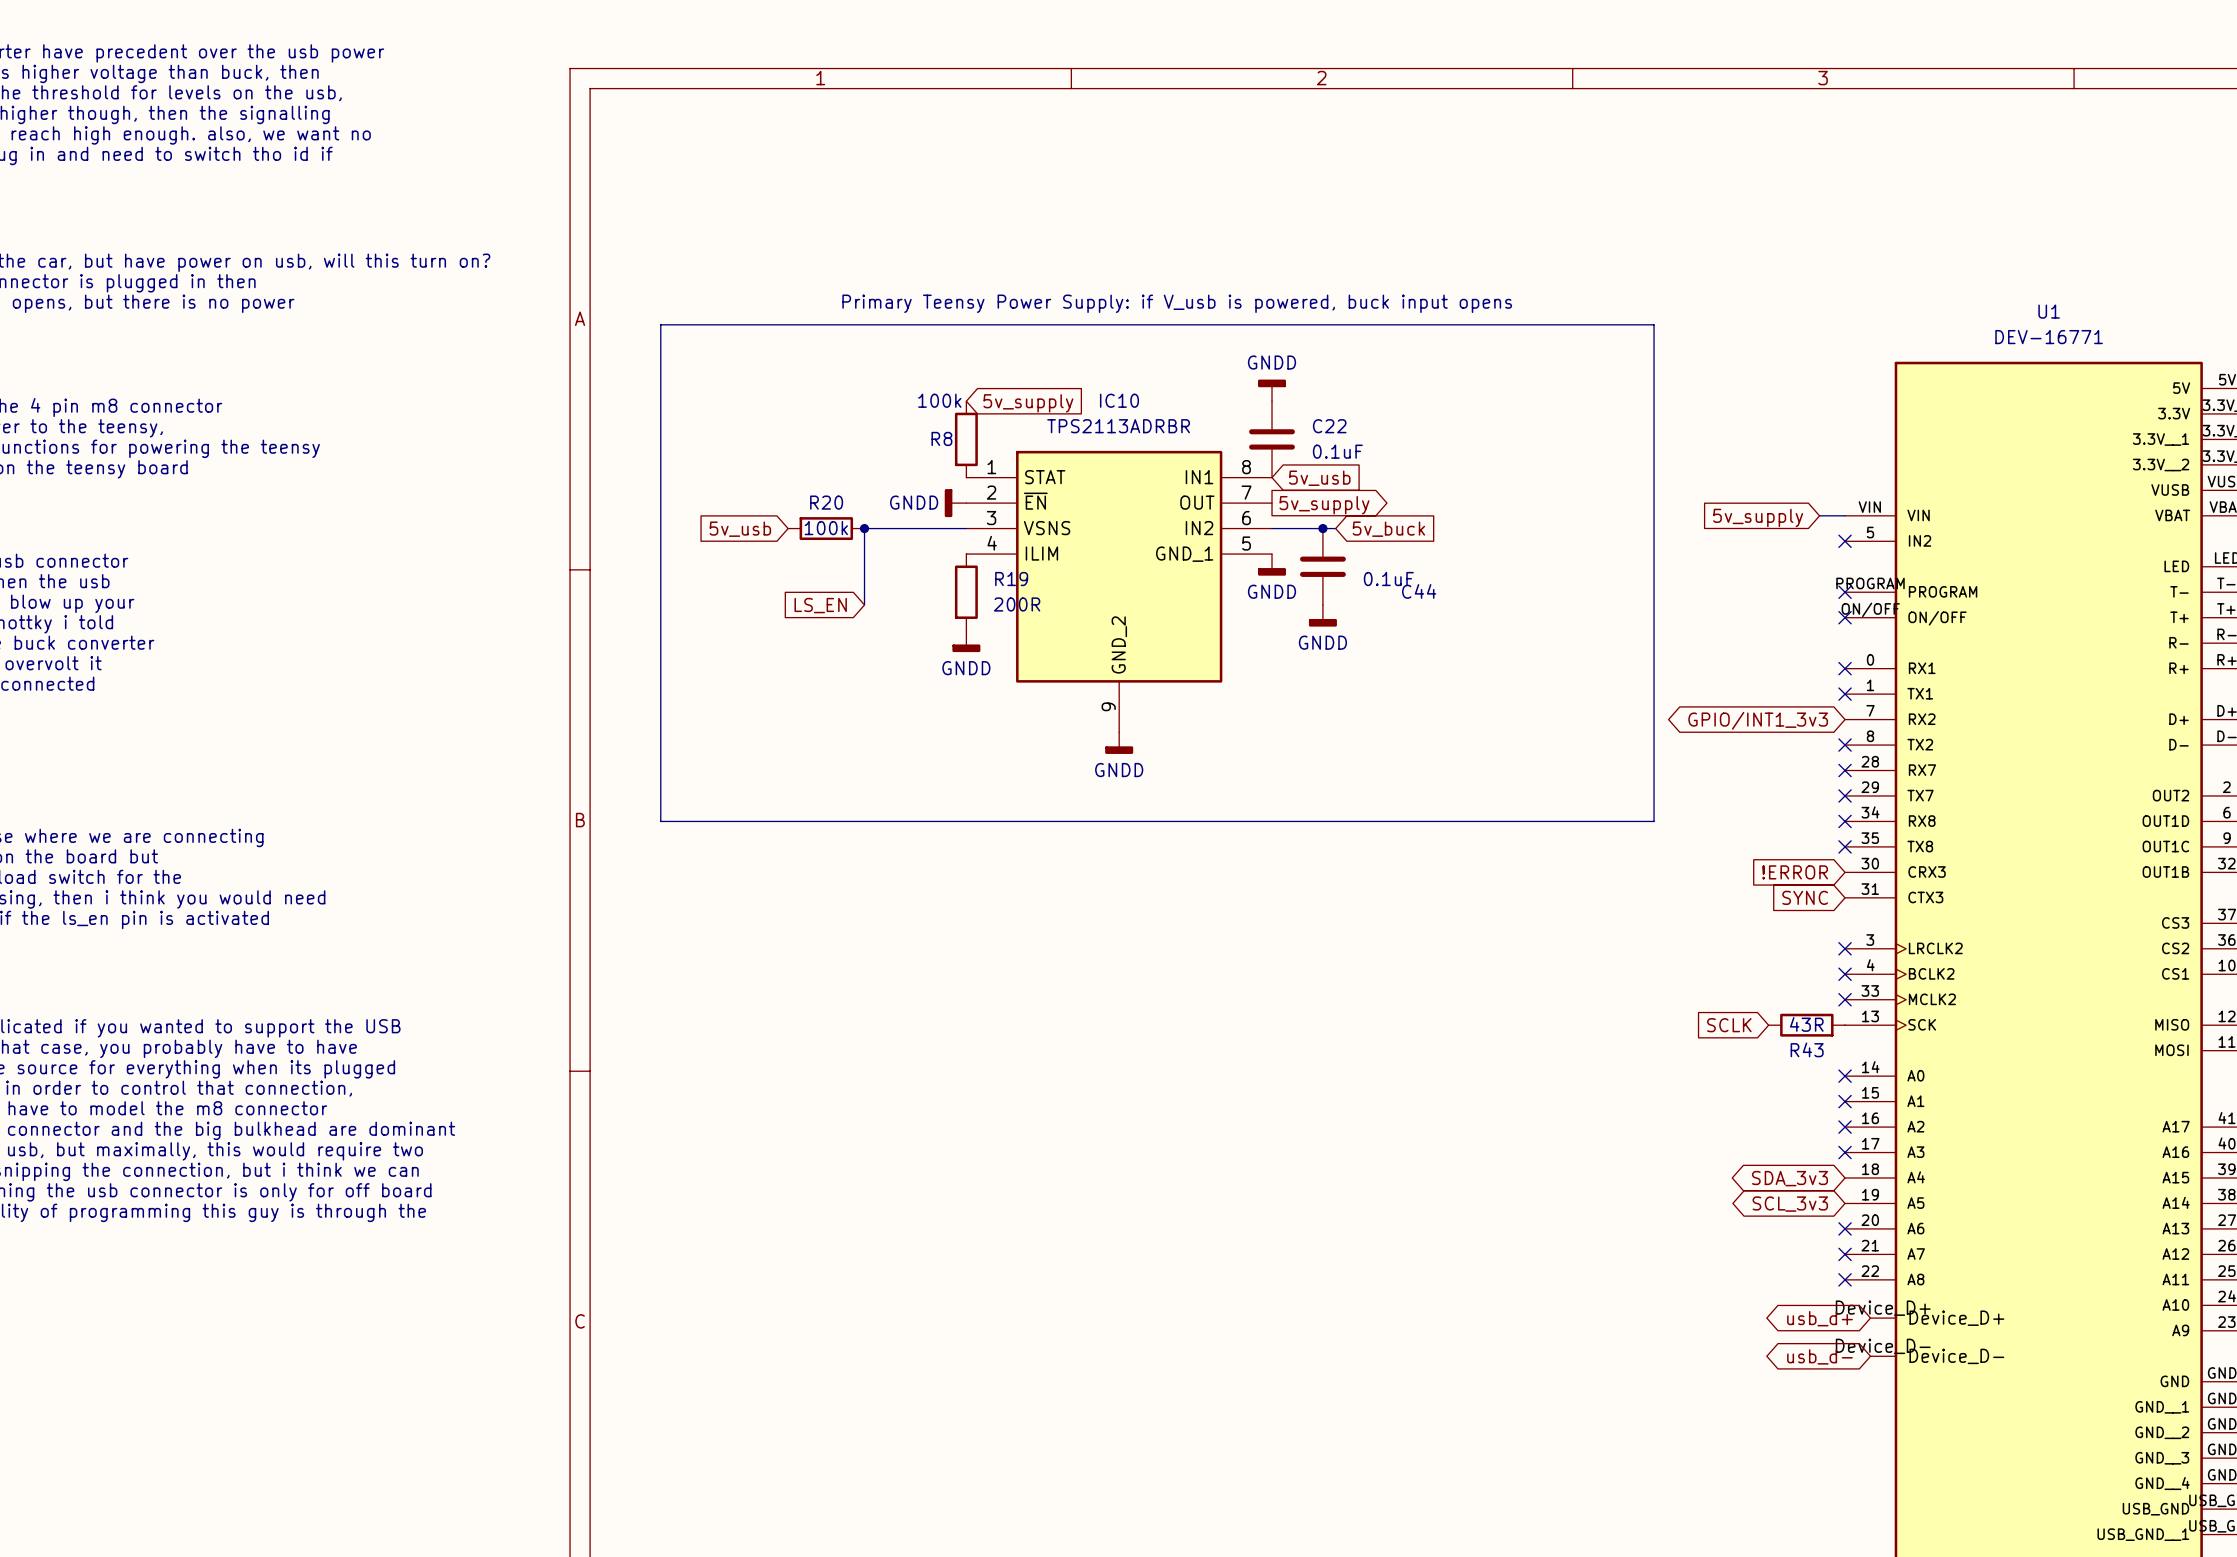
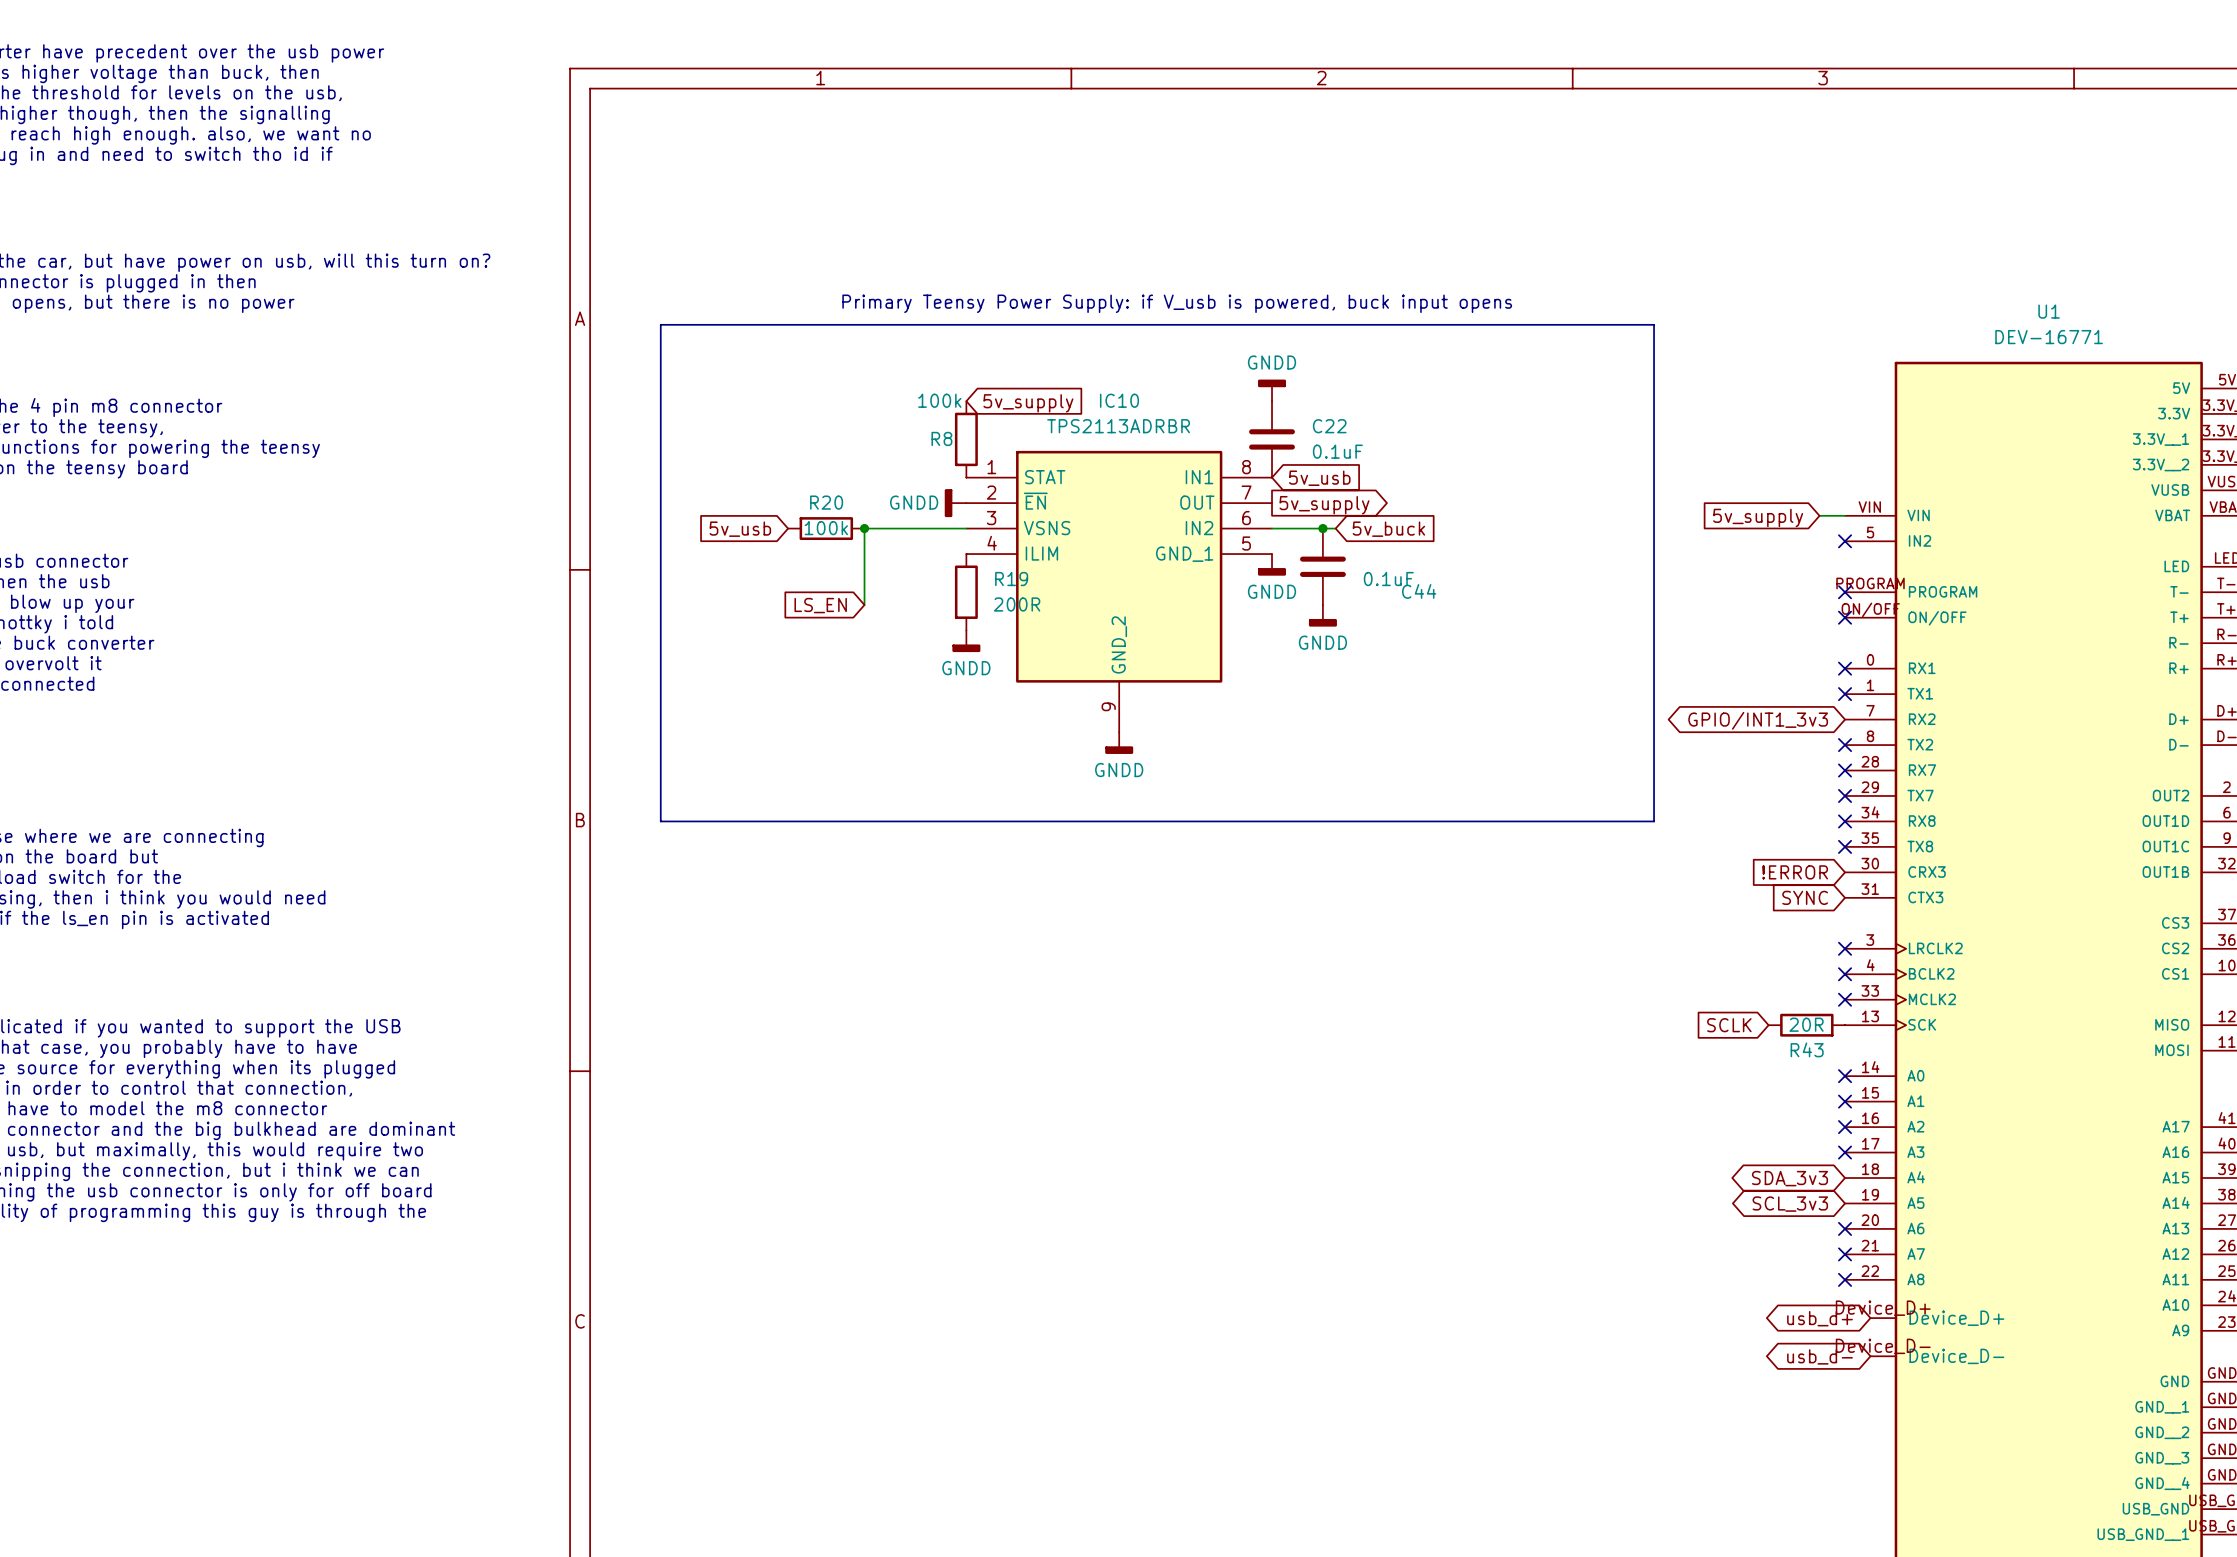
R43 value: 43R (1806, 1024) -> 20R (1806, 1024)

